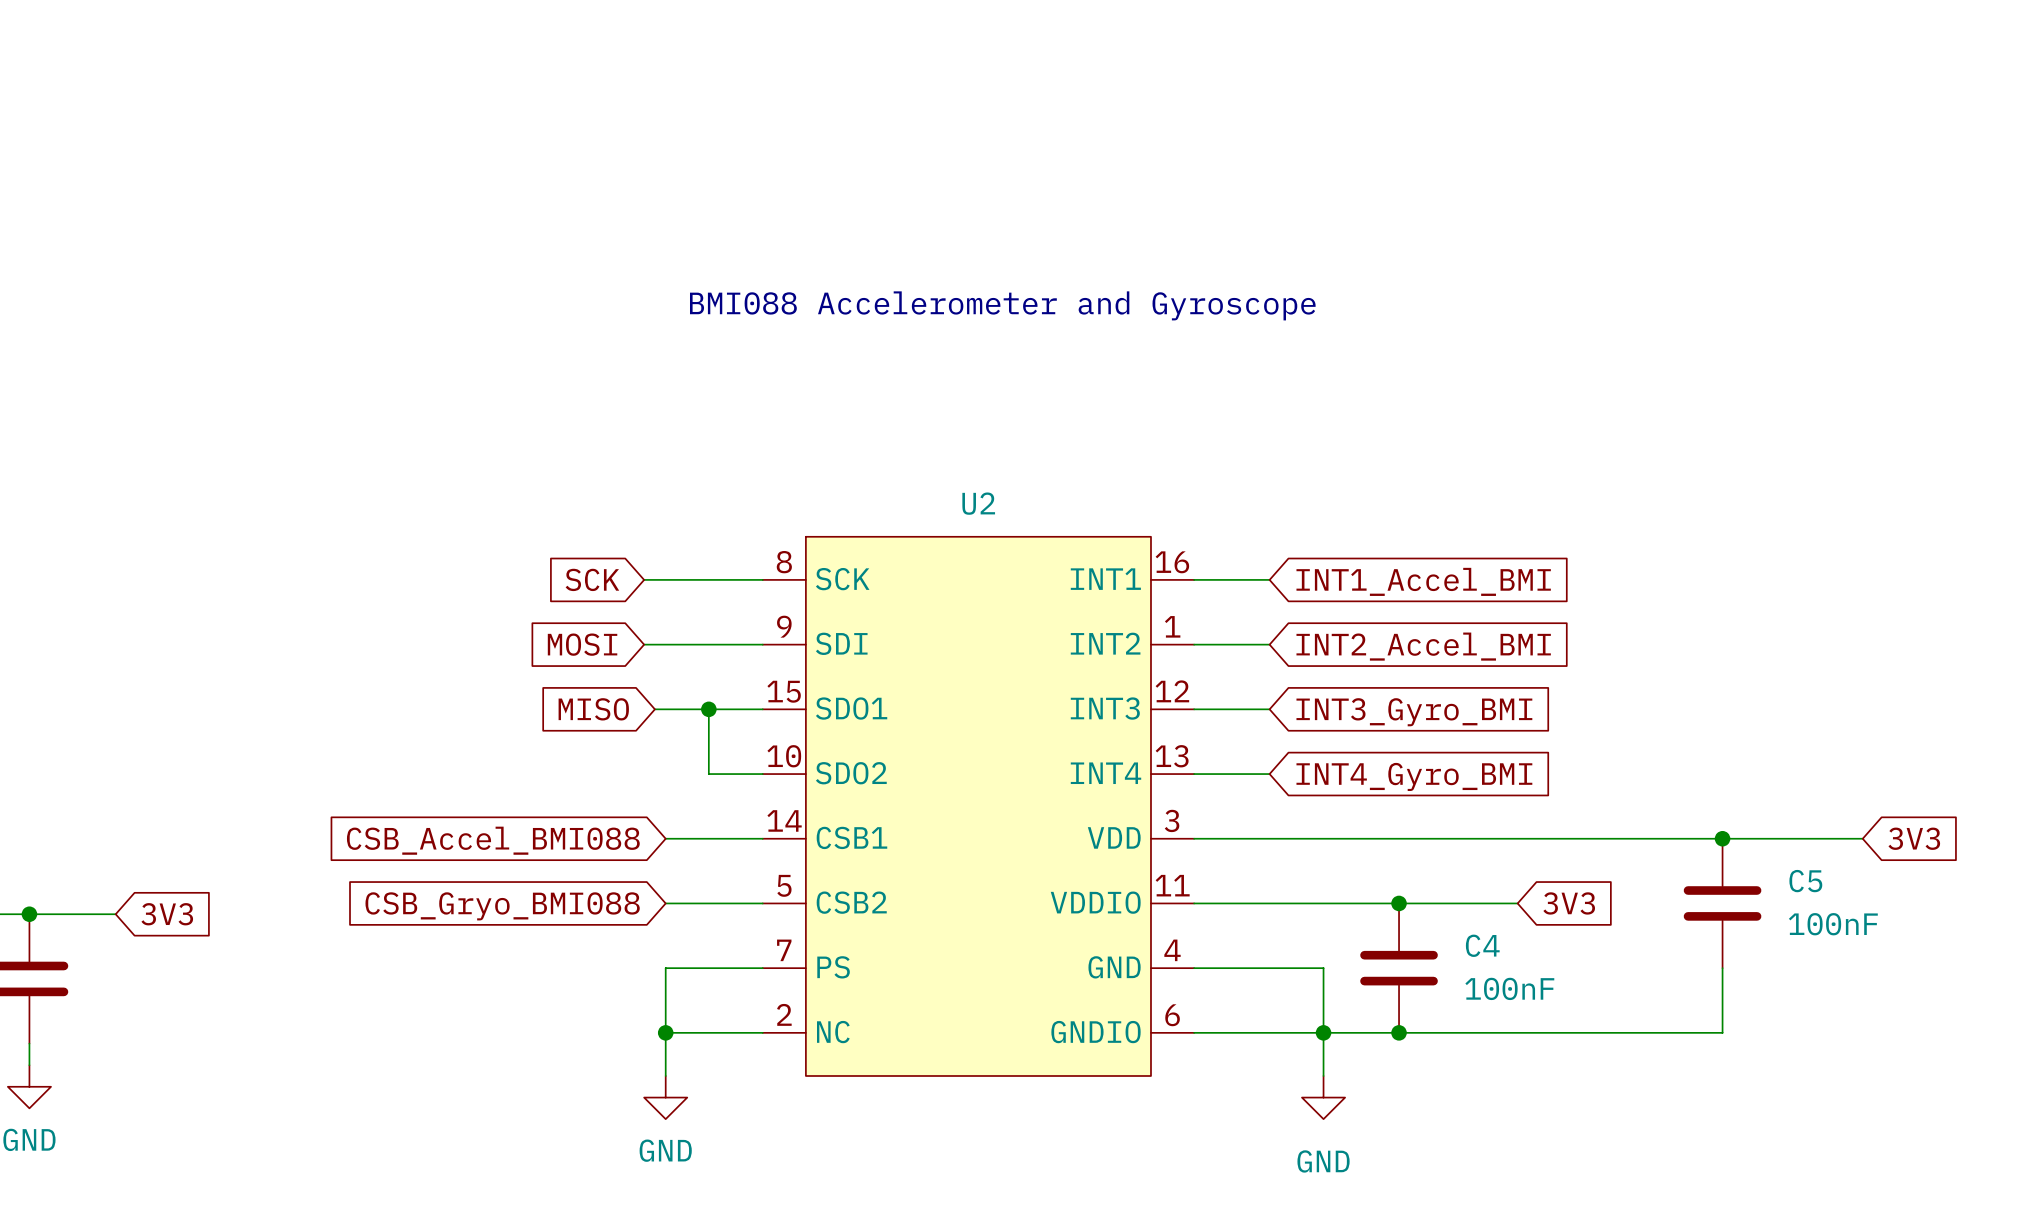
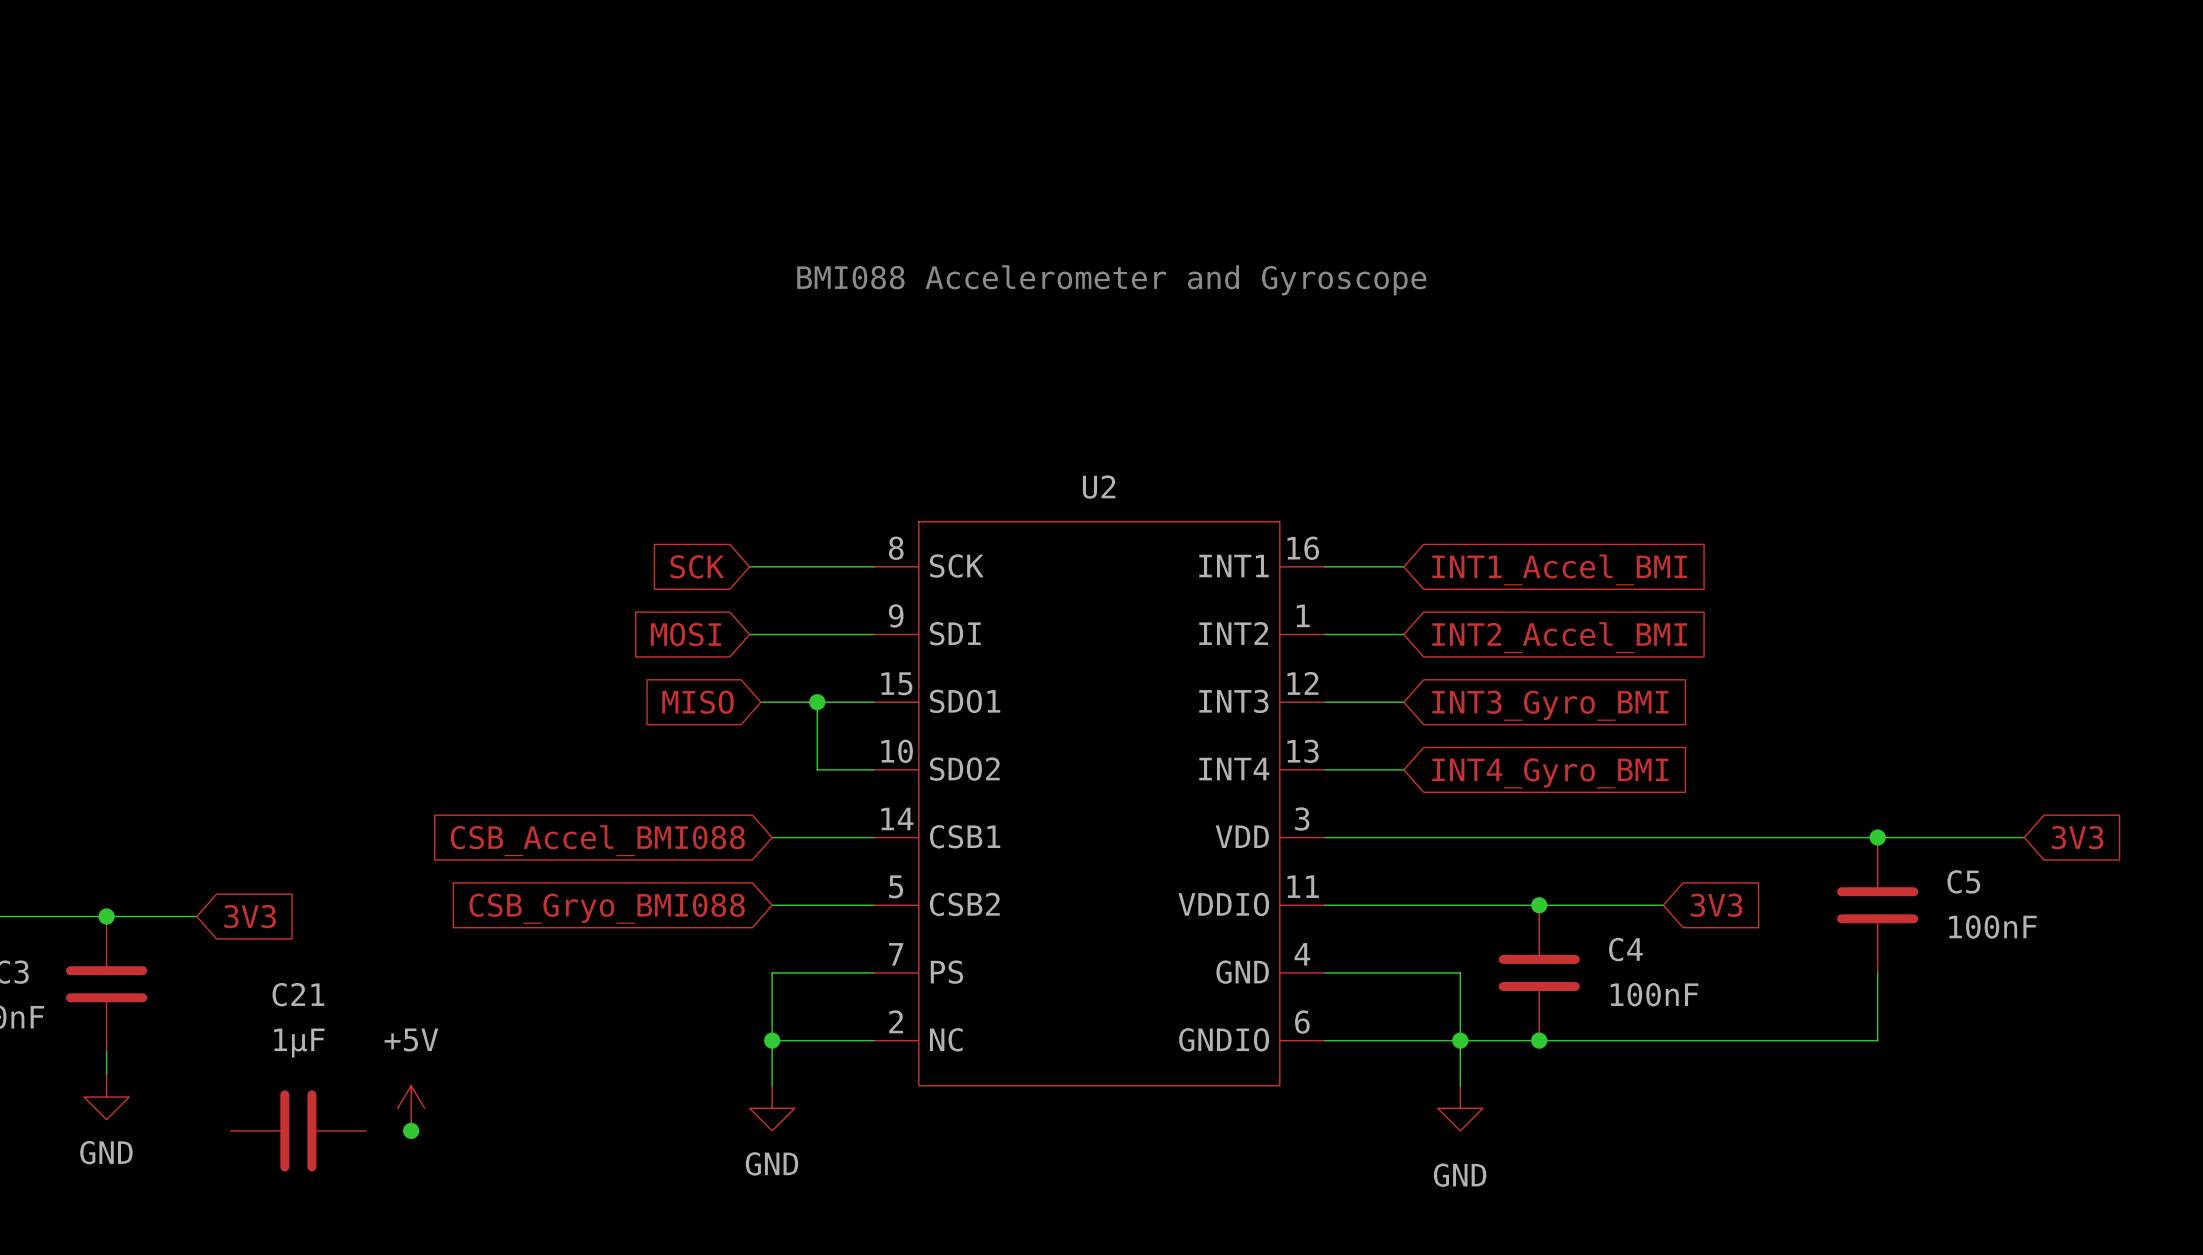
power symbol: none -> +5V (411, 1108)
C21: none -> 1µF (298, 1130)
junction: none -> (411, 1130)

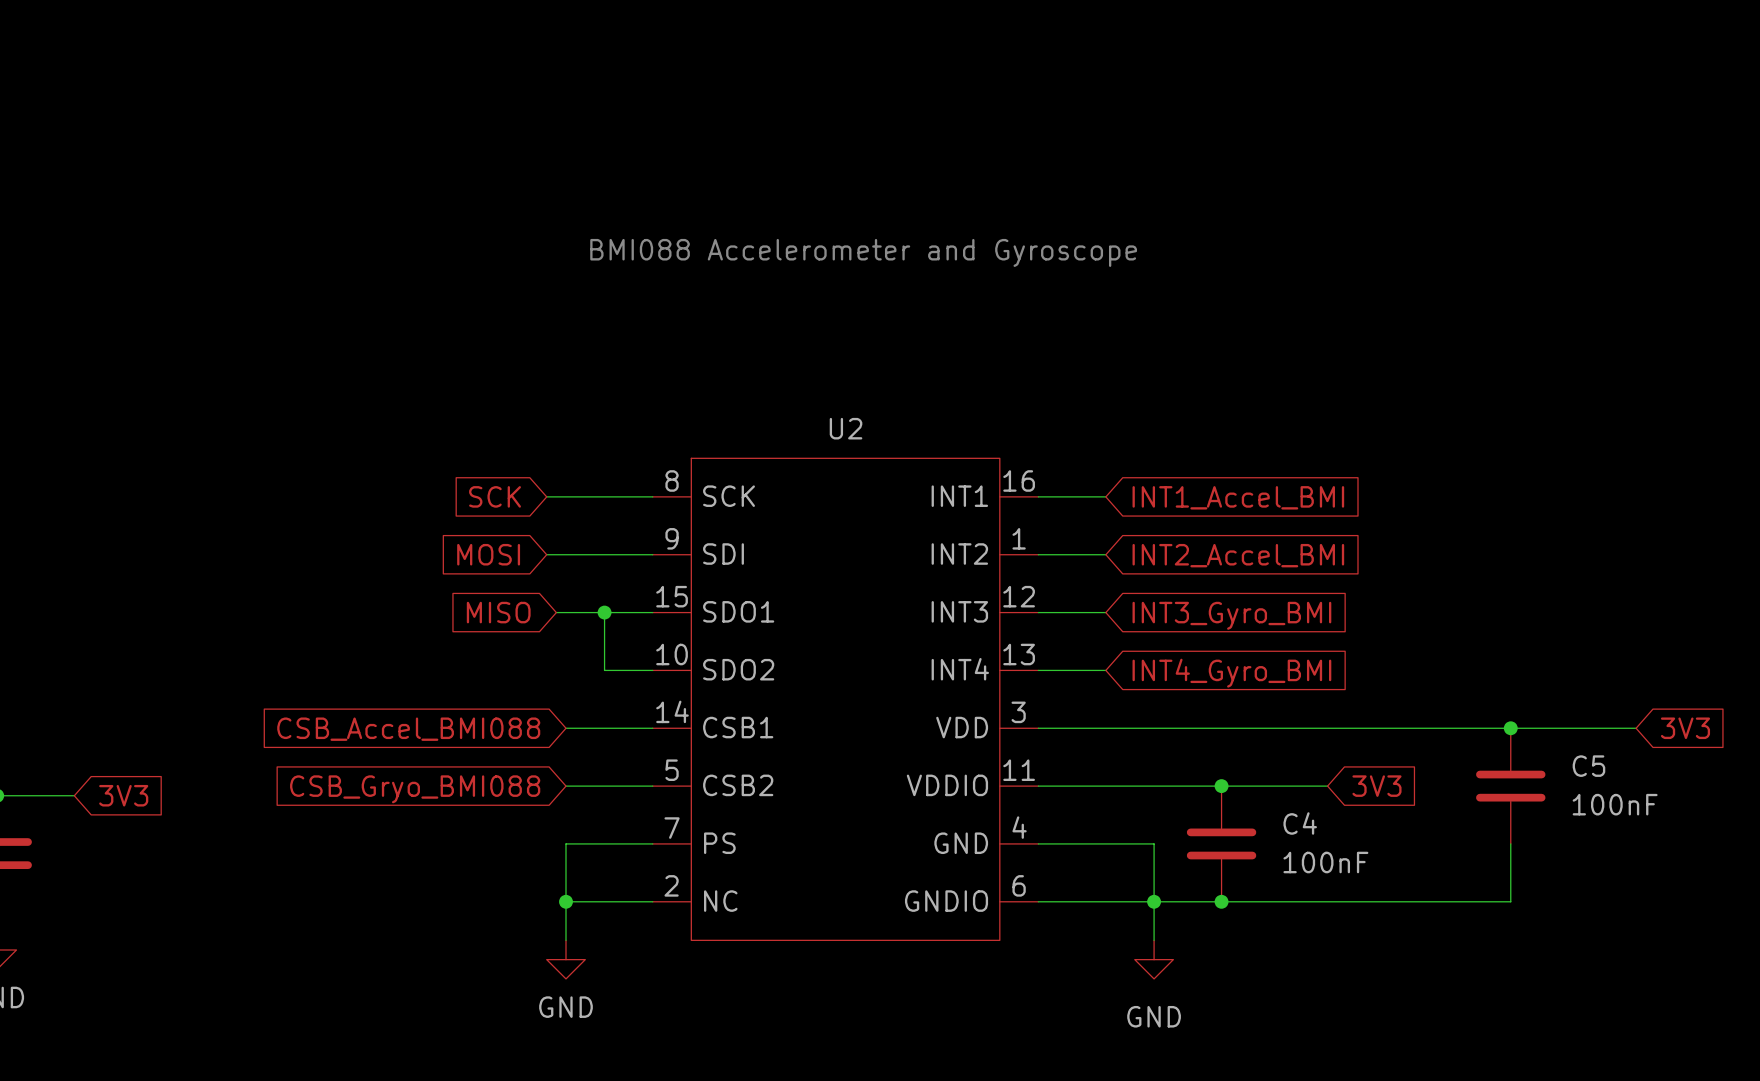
power symbol: +5V (411, 1108) -> none
C21: 1µF (298, 1130) -> none
junction: (411, 1130) -> none

